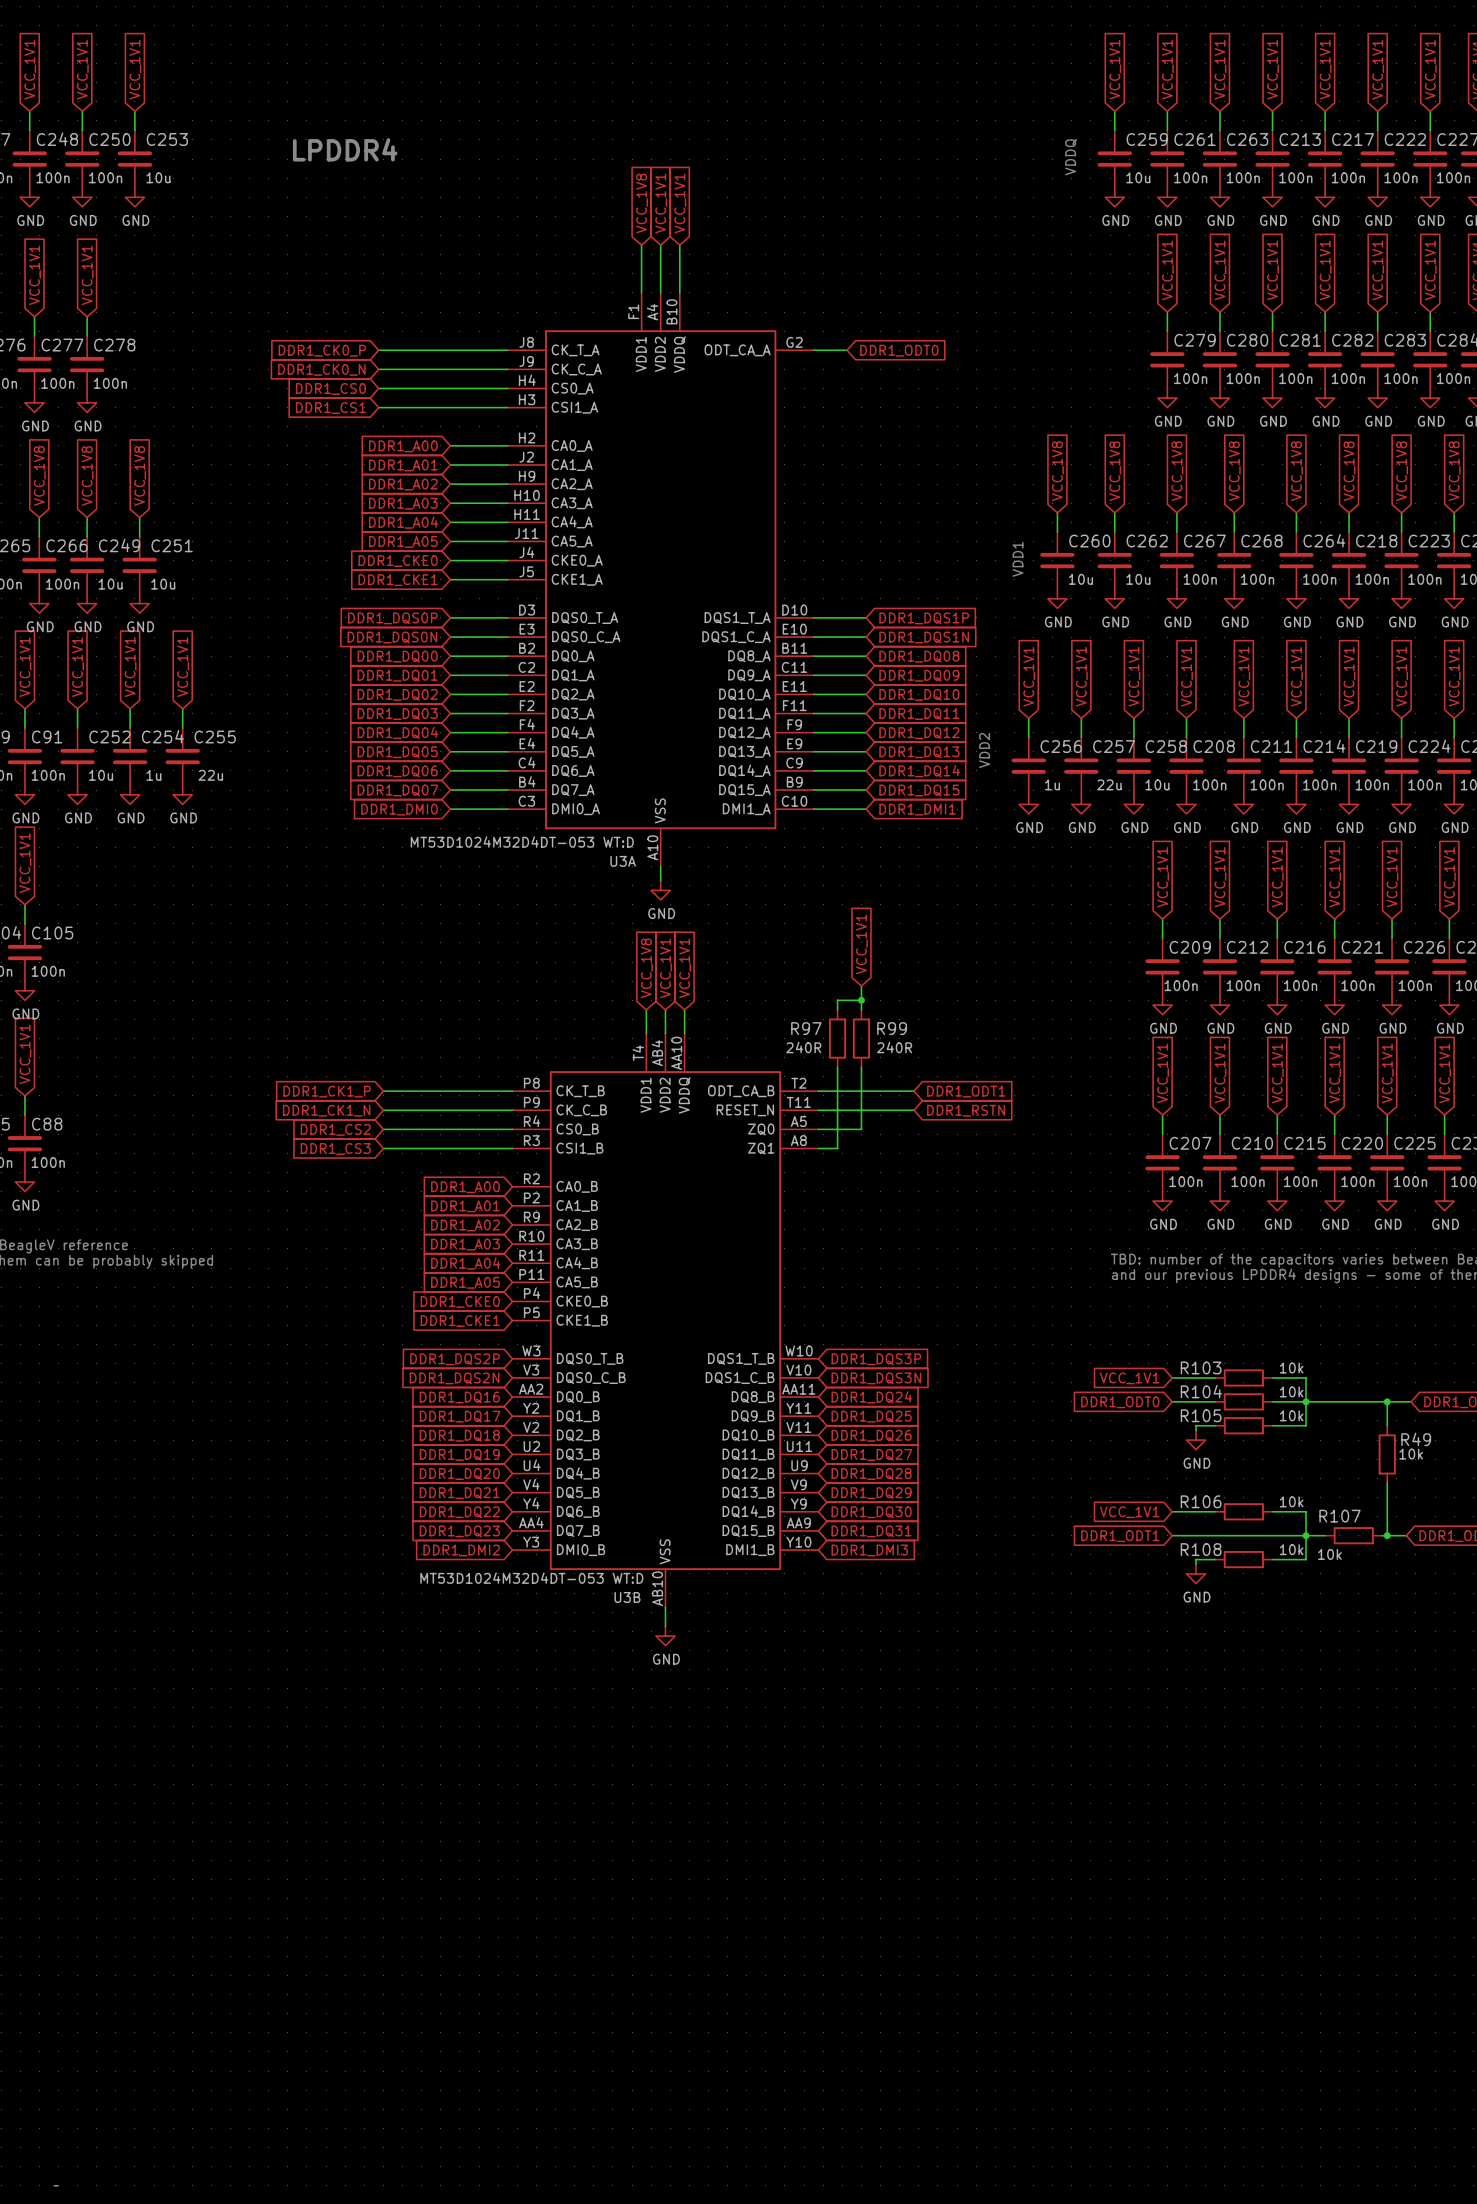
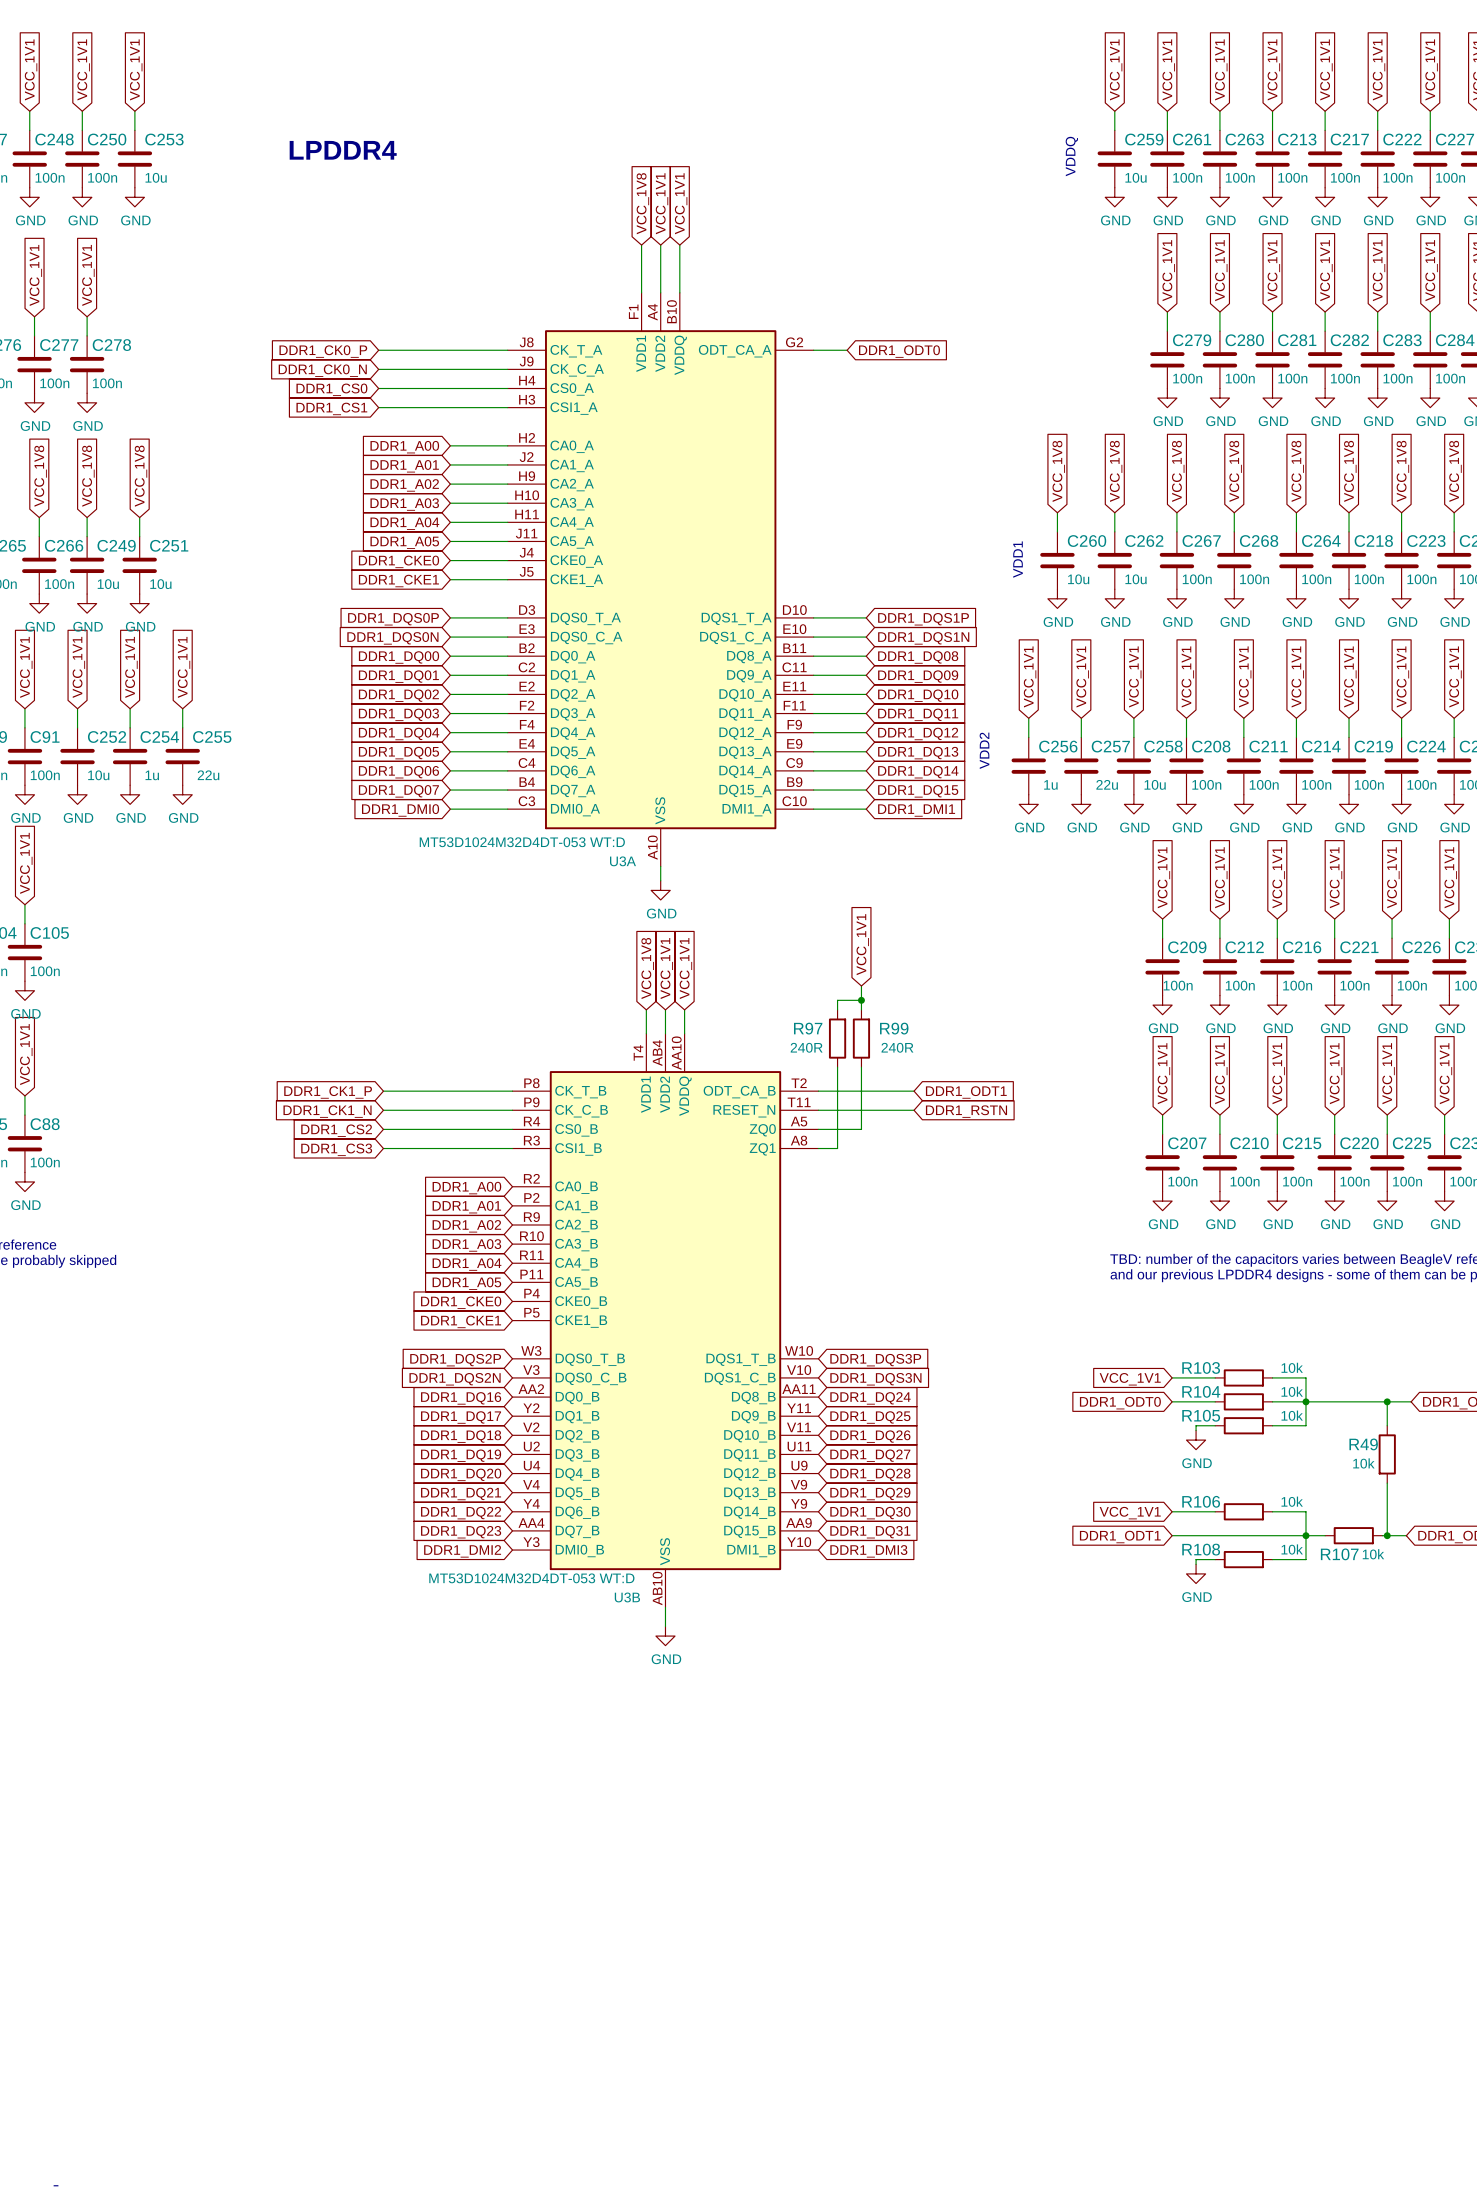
R49 name position: R49 (1416, 1439) -> R49 (1363, 1444)
R49 text position: 10k (1411, 1454) -> 10k (1363, 1463)
R107 name position: R107 (1340, 1516) -> R107 (1339, 1554)
R107 text position: 10k (1329, 1554) -> 10k (1373, 1554)

